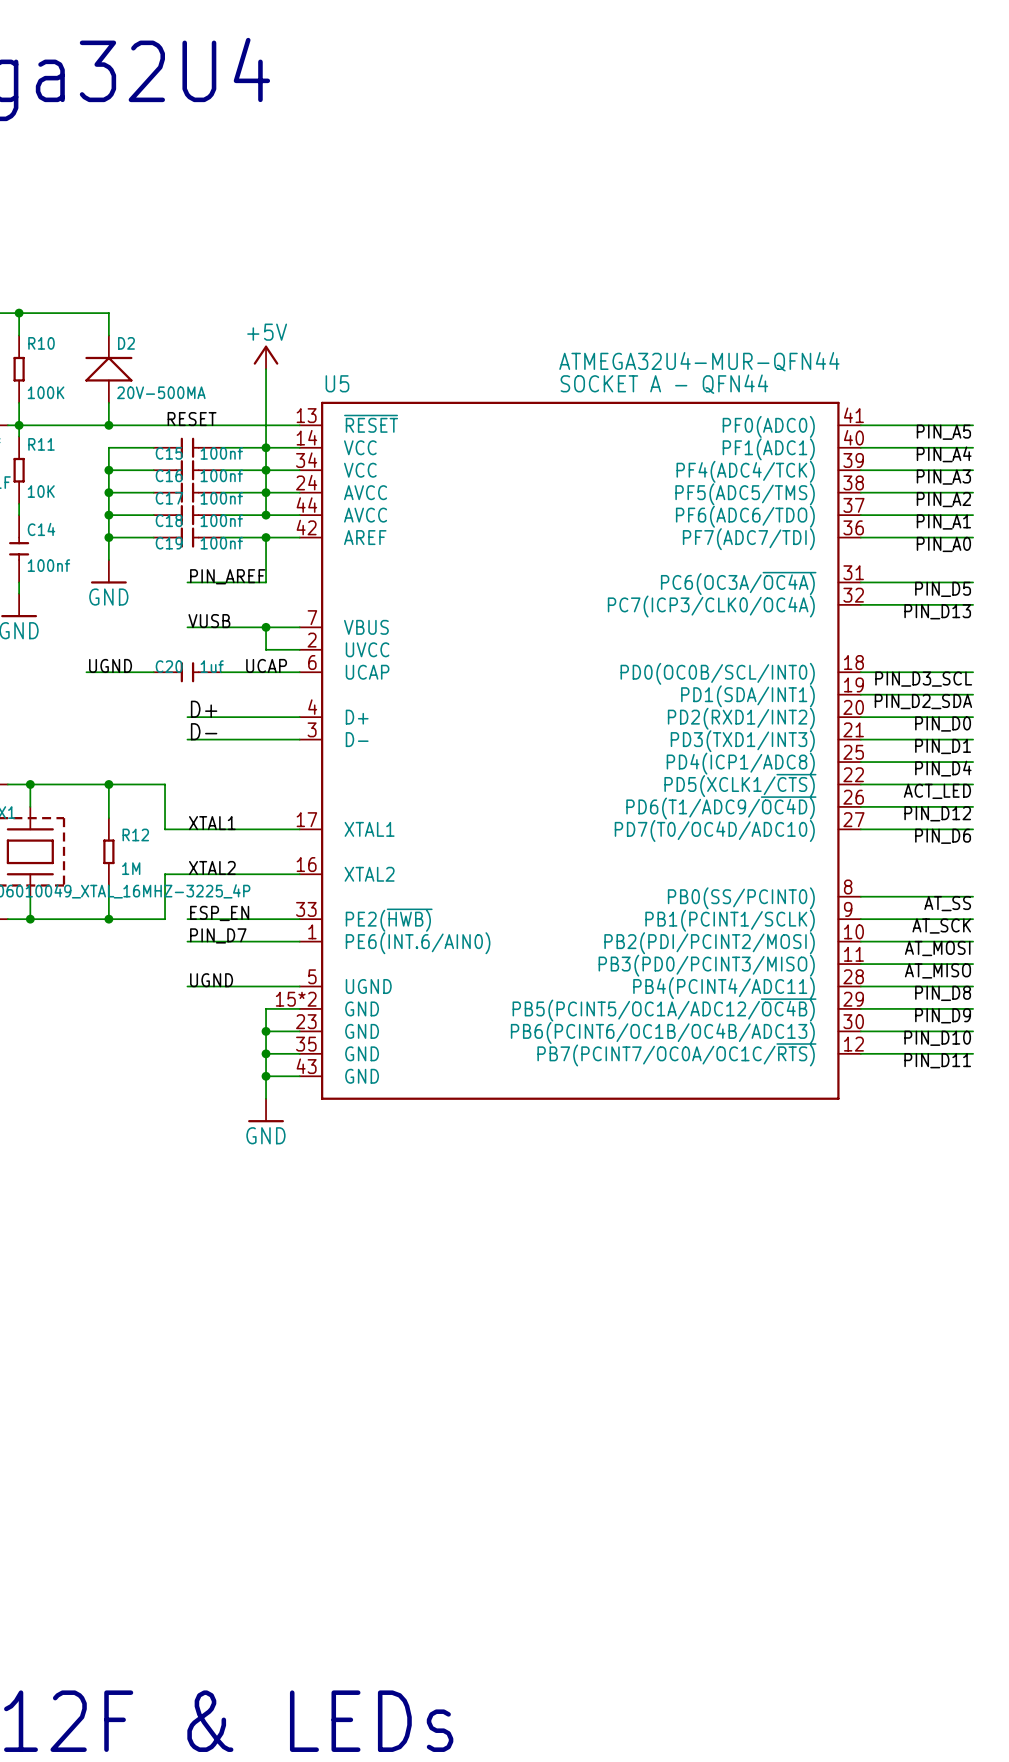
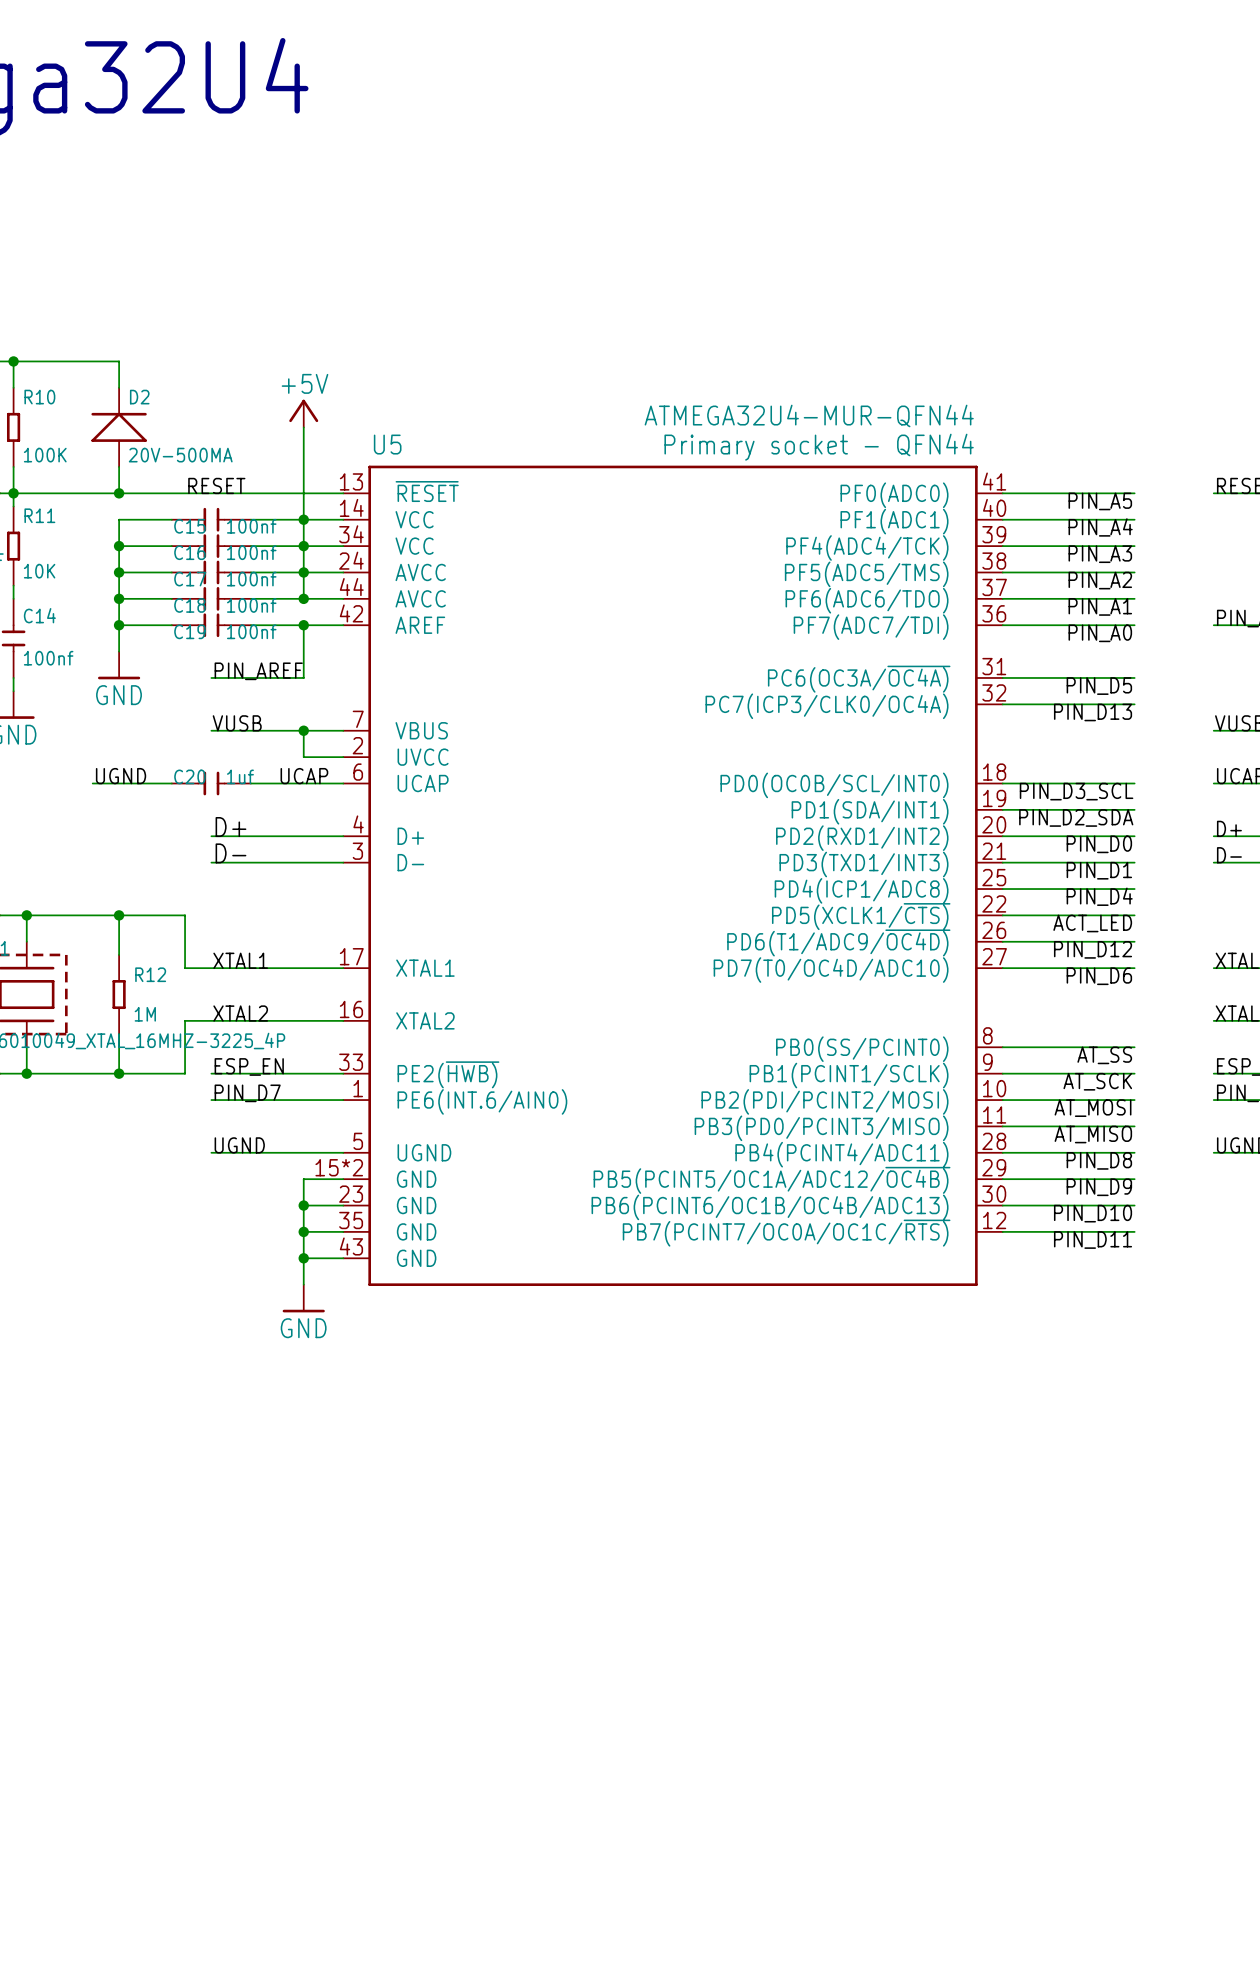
U5 value position: ATMEGA32U4-MUR-QFN44 (699, 361) -> ATMEGA32U4-MUR-QFN44 (809, 415)
U5 text: SOCKET A - QFN44 (664, 384) -> Primary socket - QFN44 (819, 447)

